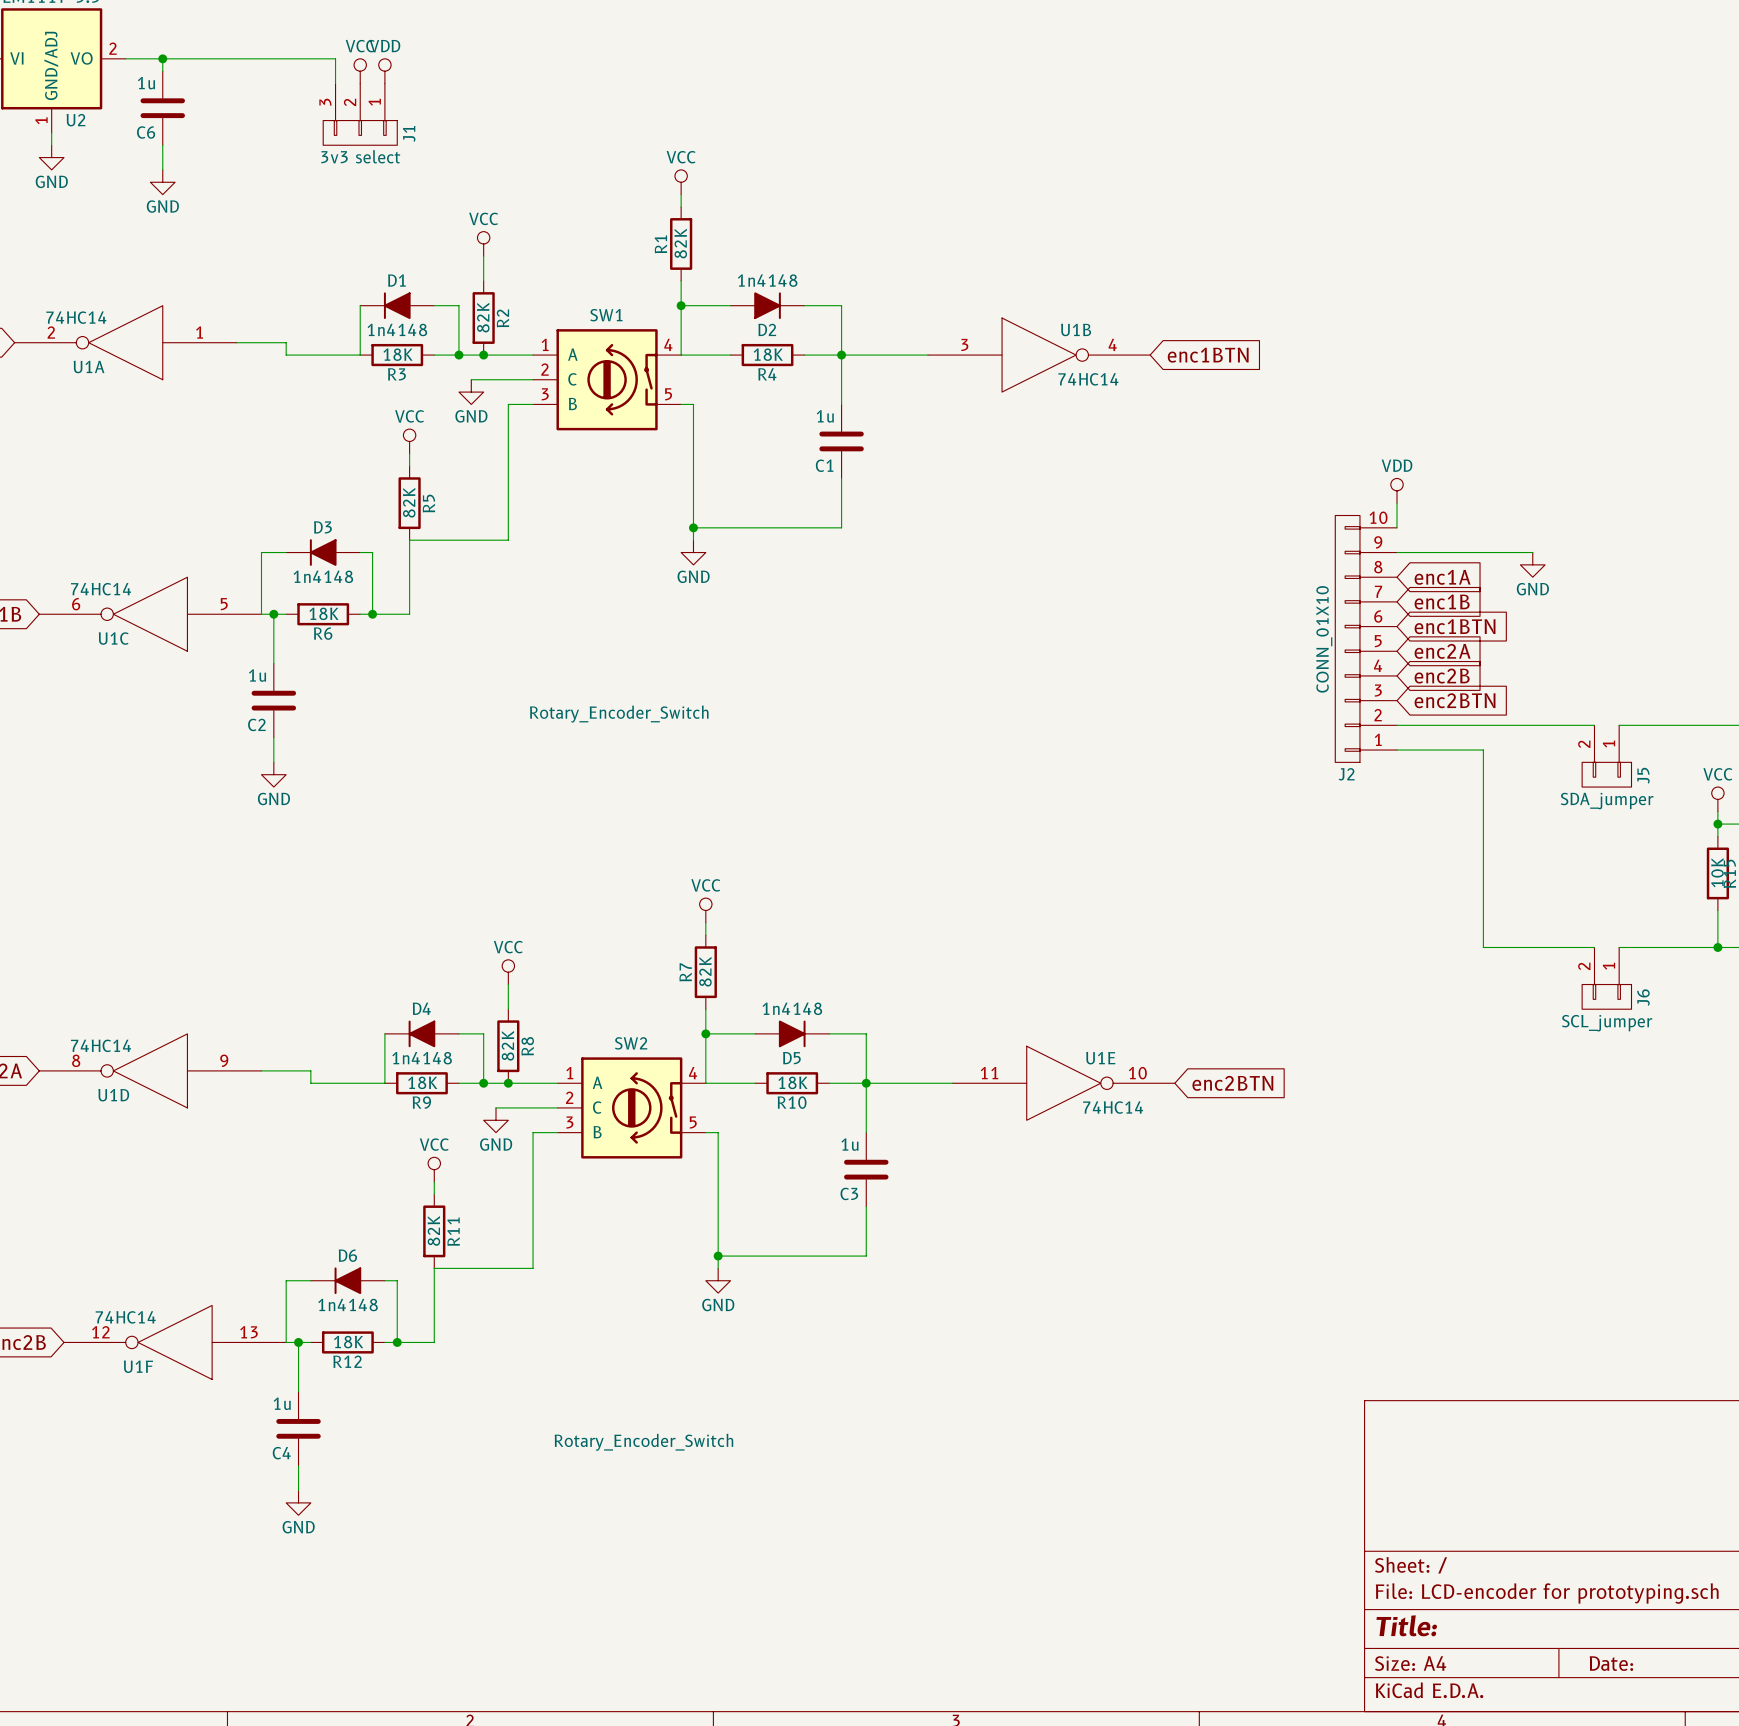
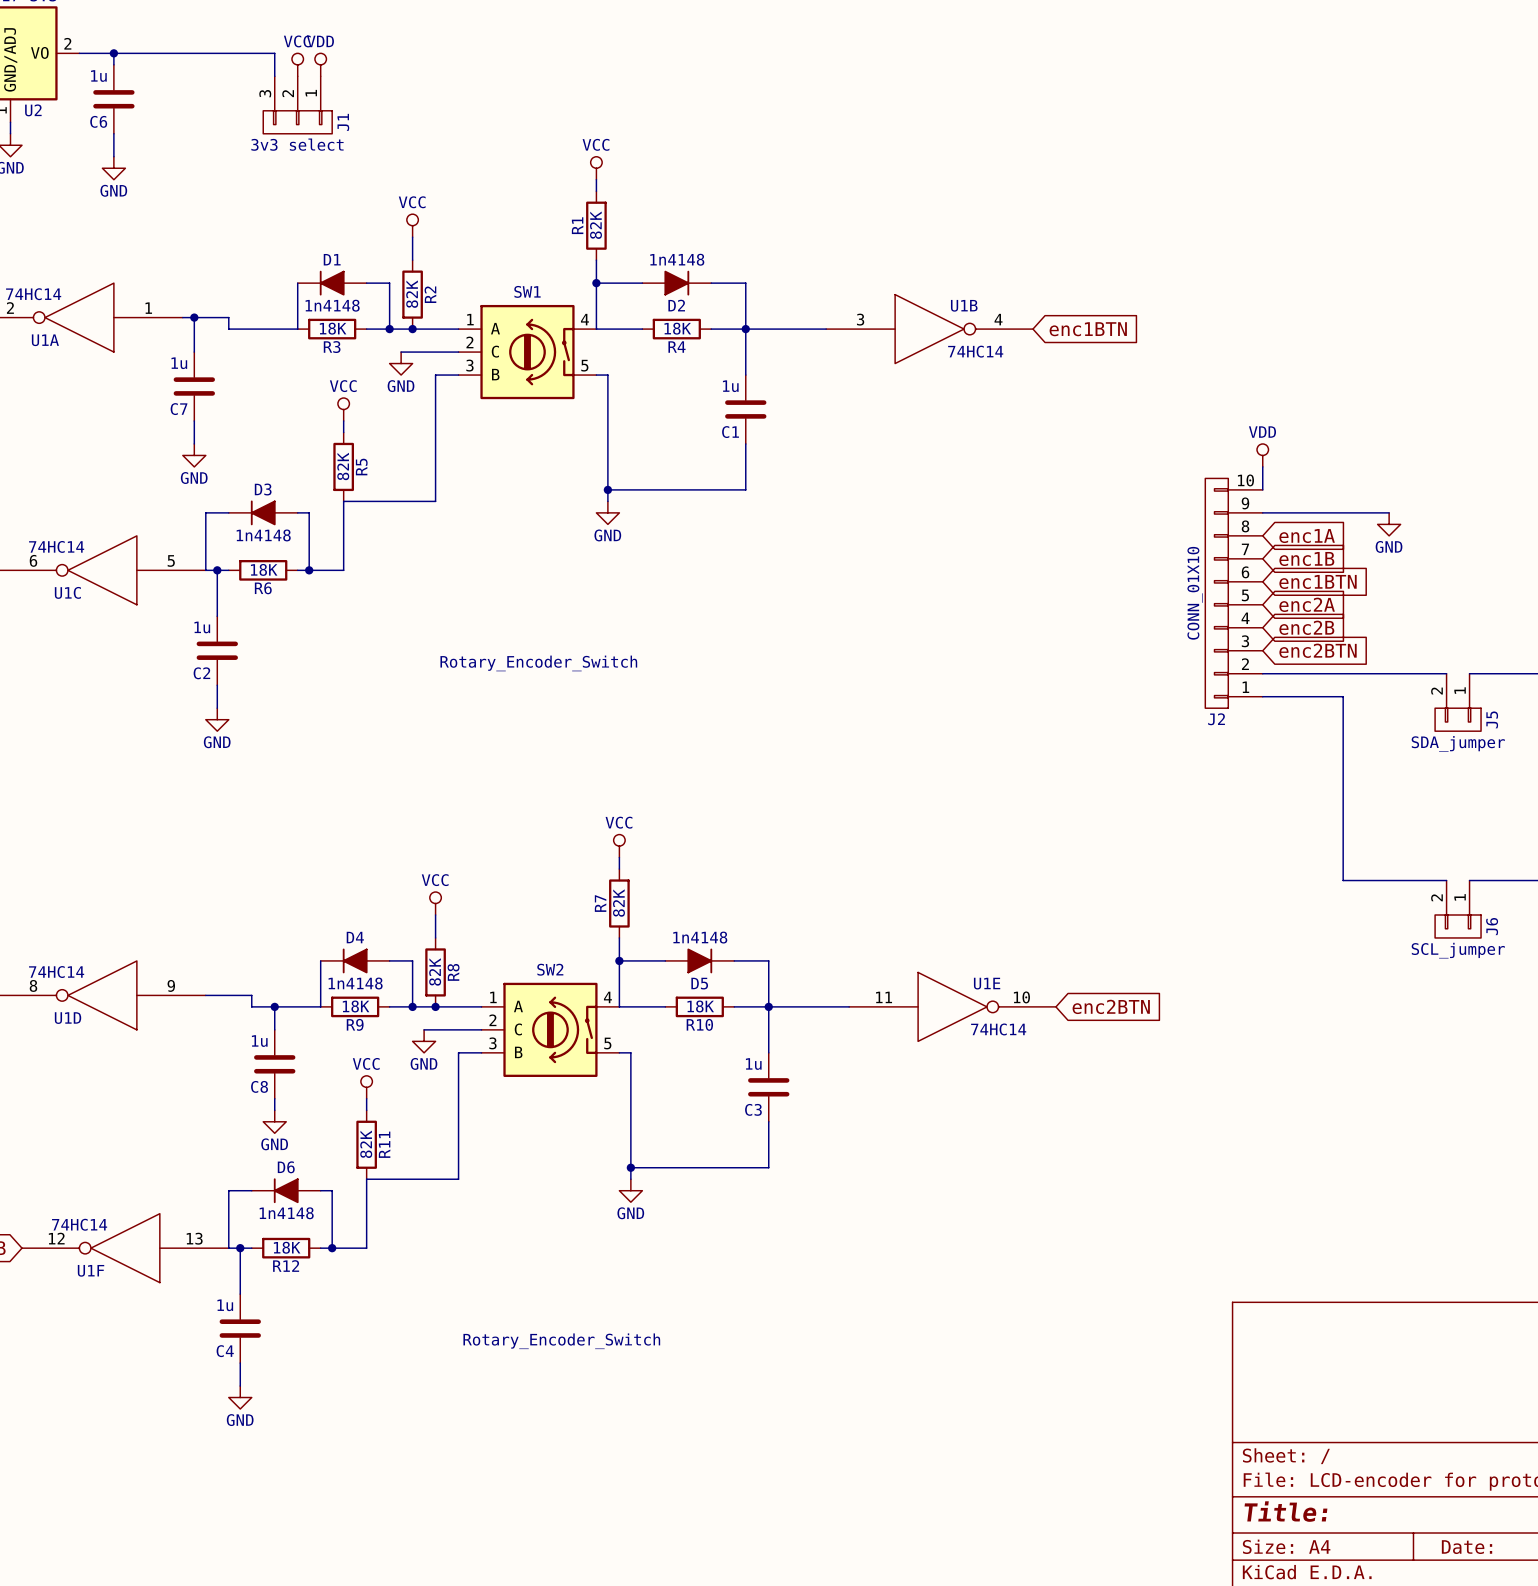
wire: none -> (194, 317) (194, 352)
junction: none -> (194, 317)
C7: none -> 1u (194, 386)
wire: none -> (194, 420) (194, 443)
power symbol: none -> GND (194, 455)
wire: none -> (274, 1006) (274, 1029)
junction: none -> (274, 1006)
C8: none -> 1u (274, 1064)
wire: none -> (274, 1098) (274, 1110)
power symbol: none -> GND (274, 1121)

